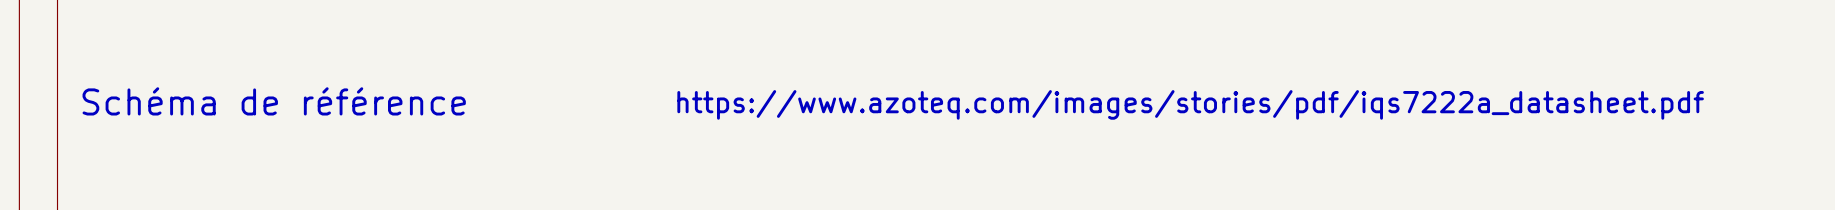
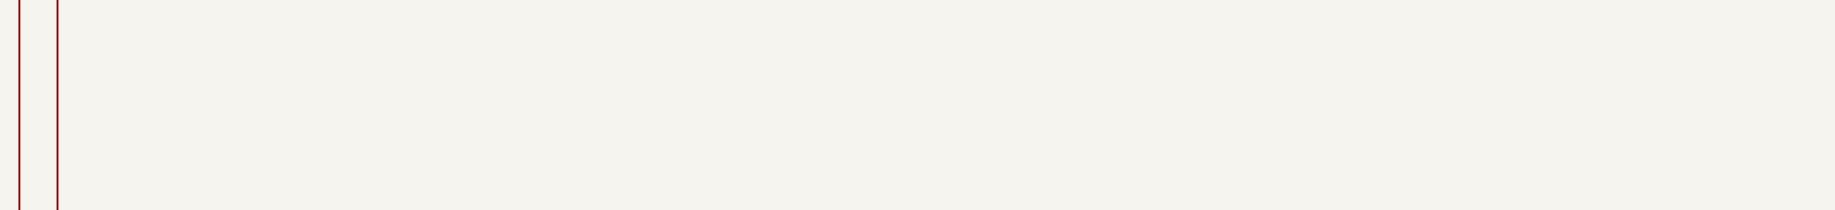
text: Schéma de référence (274, 101) -> none
text: https://www.azoteq.com/images/stories/pdf/iqs7222a_datasheet.pdf (1190, 104) -> none

